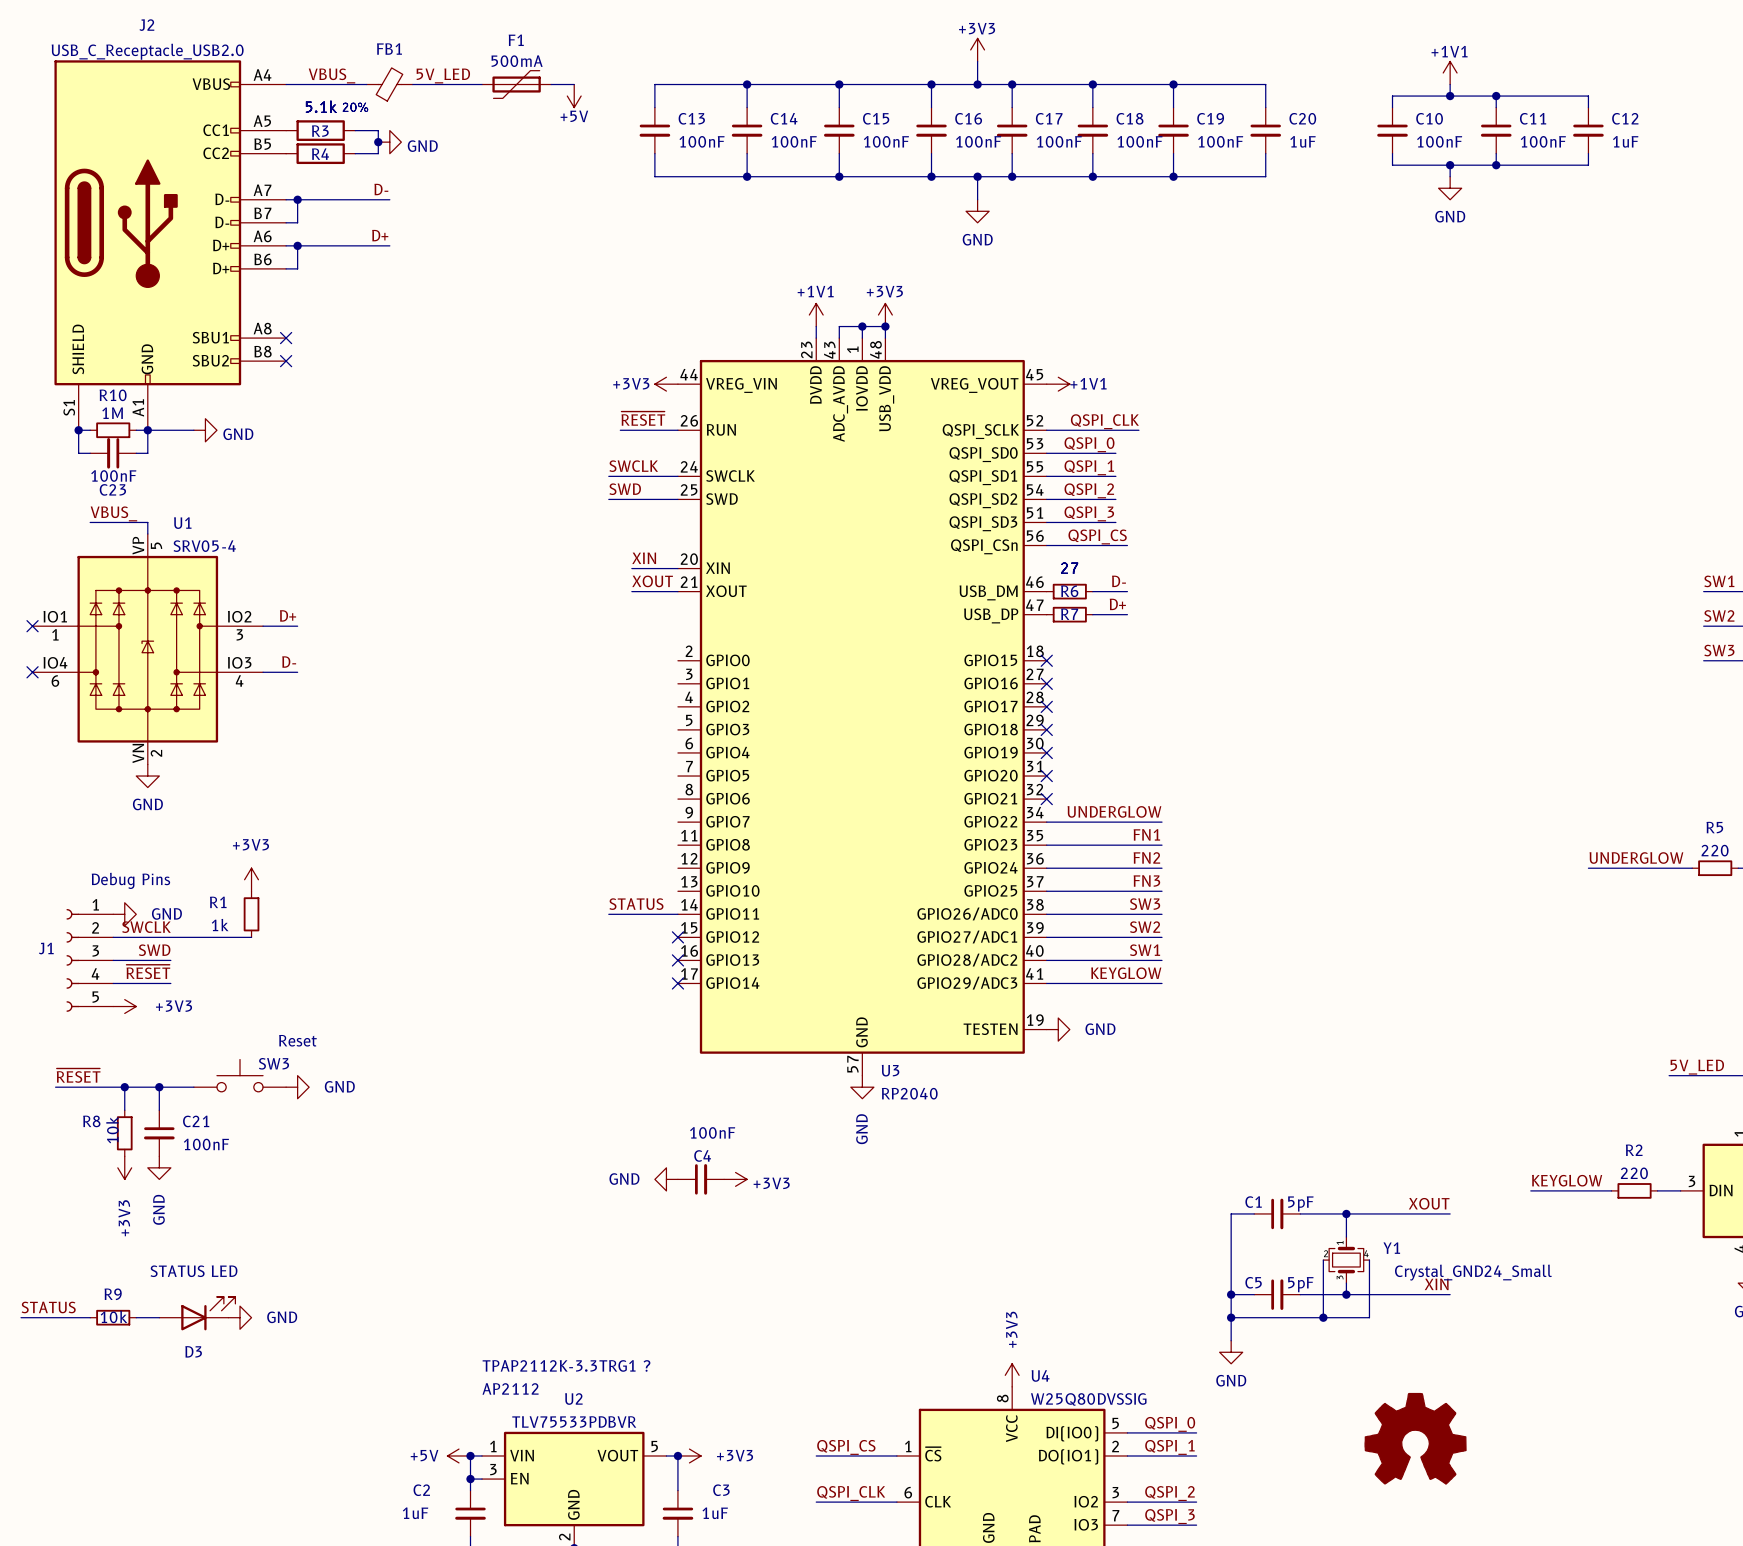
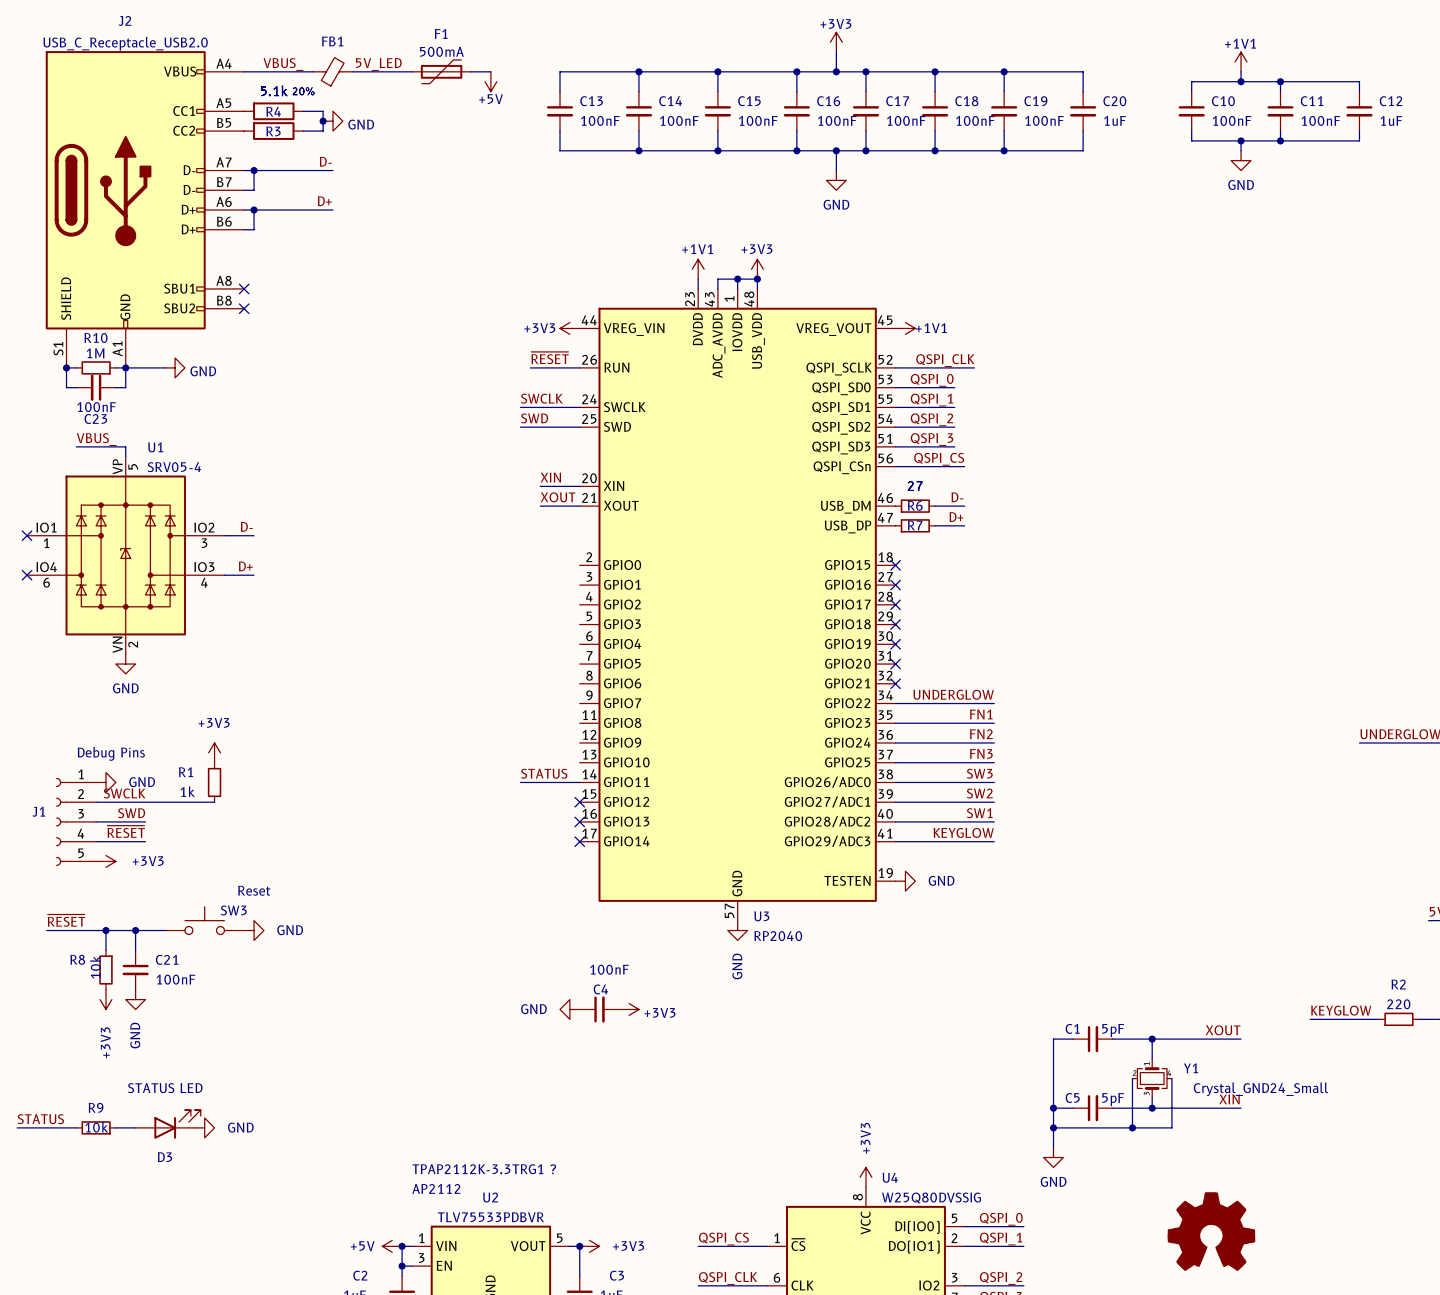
R3 name: R3 (320, 131) -> R4 (273, 111)
R4 name: R4 (320, 154) -> R3 (273, 131)
label: D+ (288, 615) -> D- (246, 526)
label: D- (289, 662) -> D+ (245, 566)

